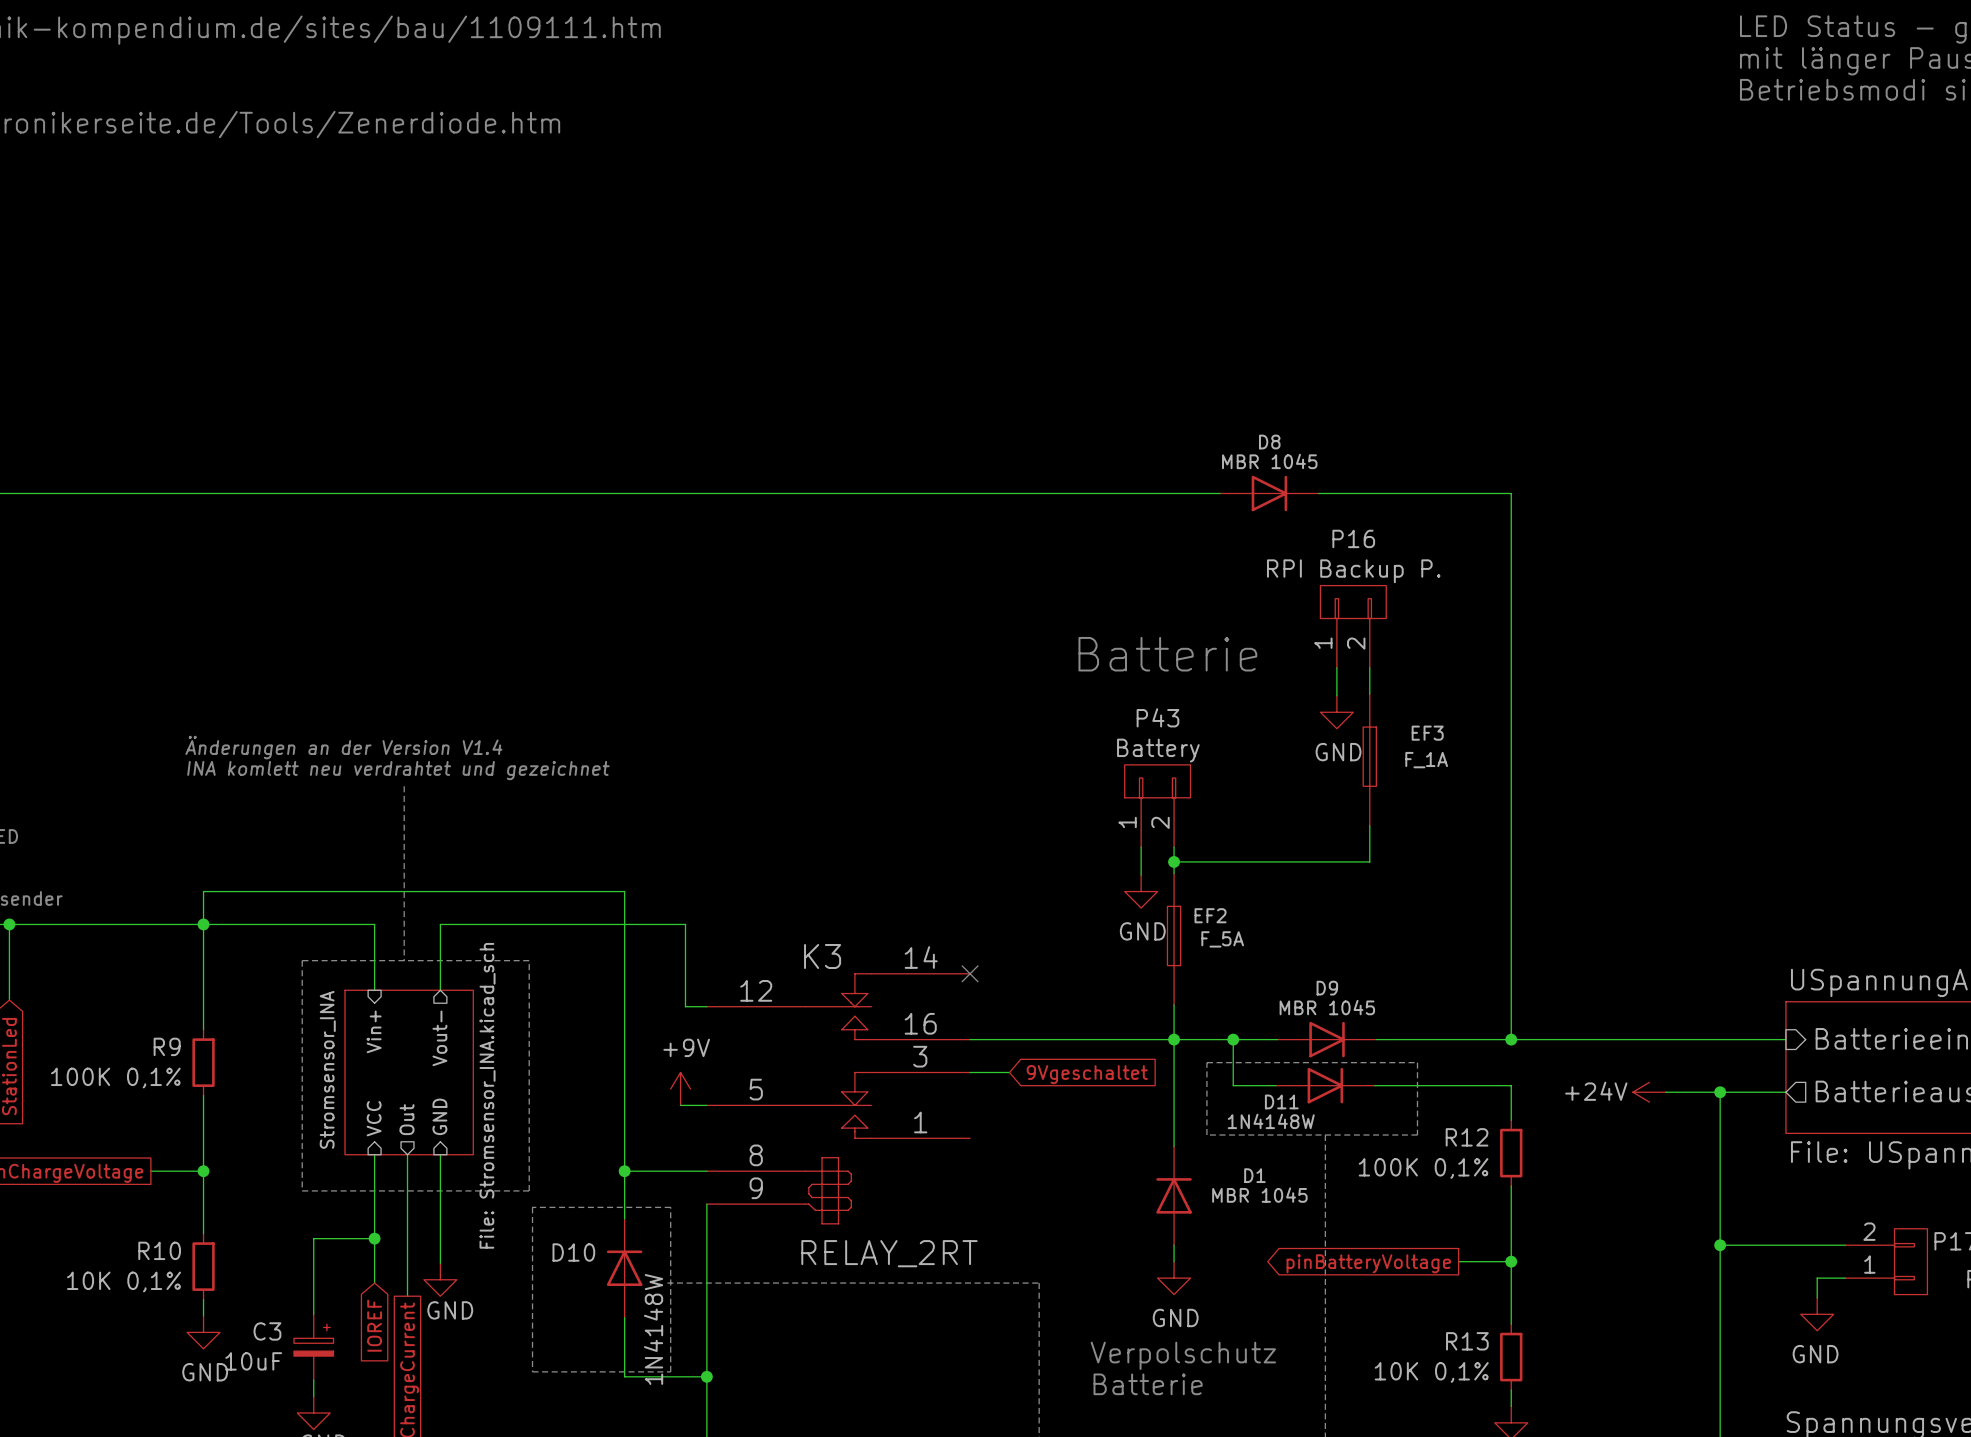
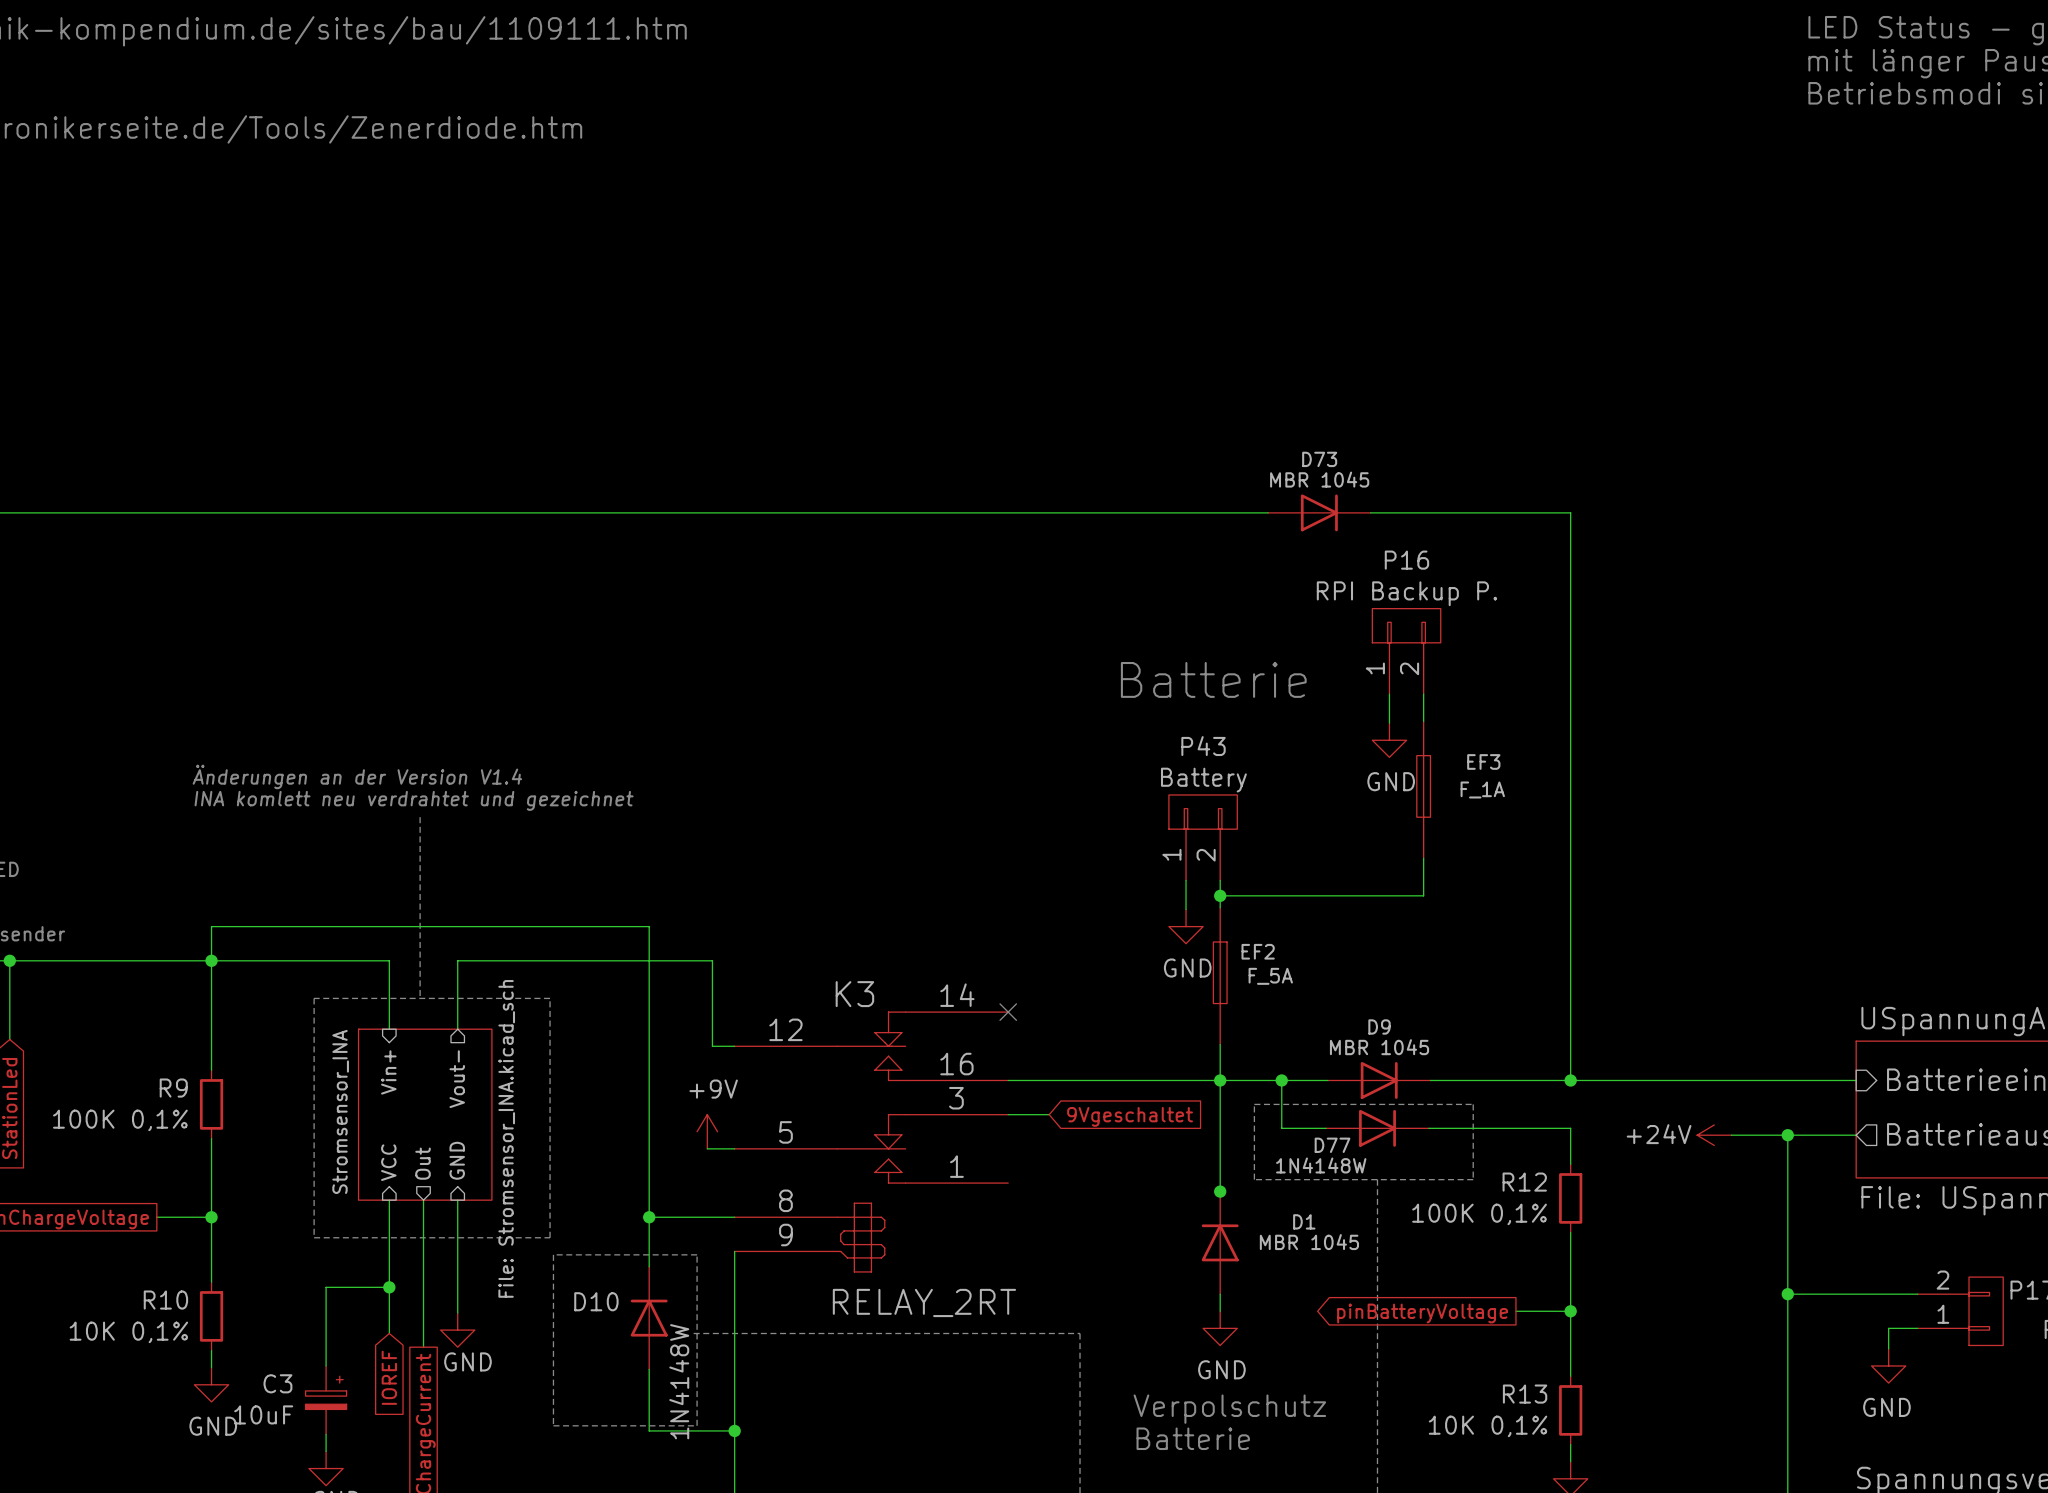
D8 name: D8 (1269, 442) -> D73 (1319, 459)
D11 name: D11 (1281, 1101) -> D77 (1332, 1145)
junction: none -> (1220, 1191)

